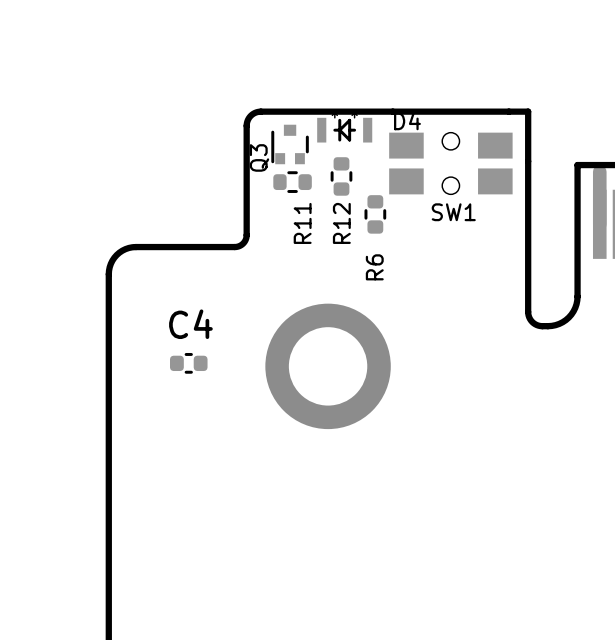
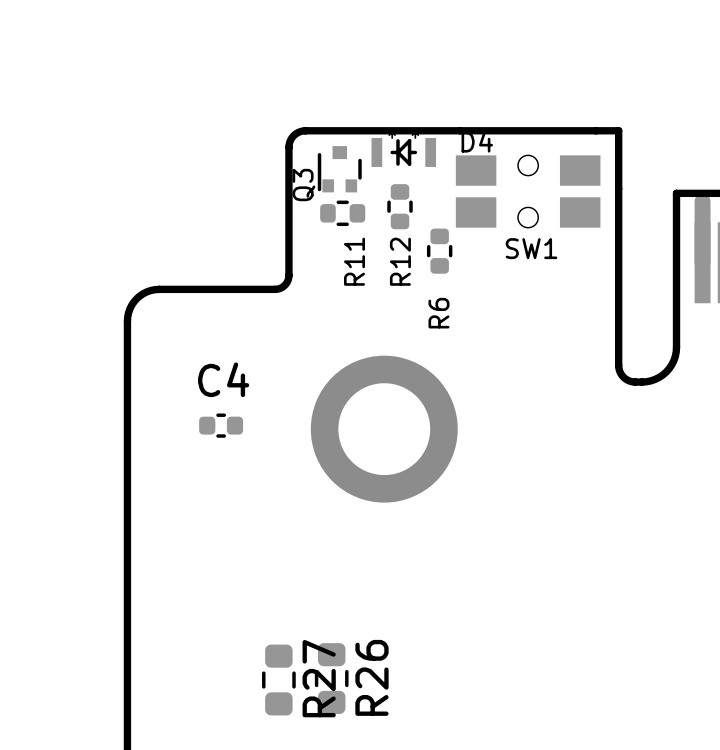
R26: none -> (331, 678)
R27: none -> (278, 680)

